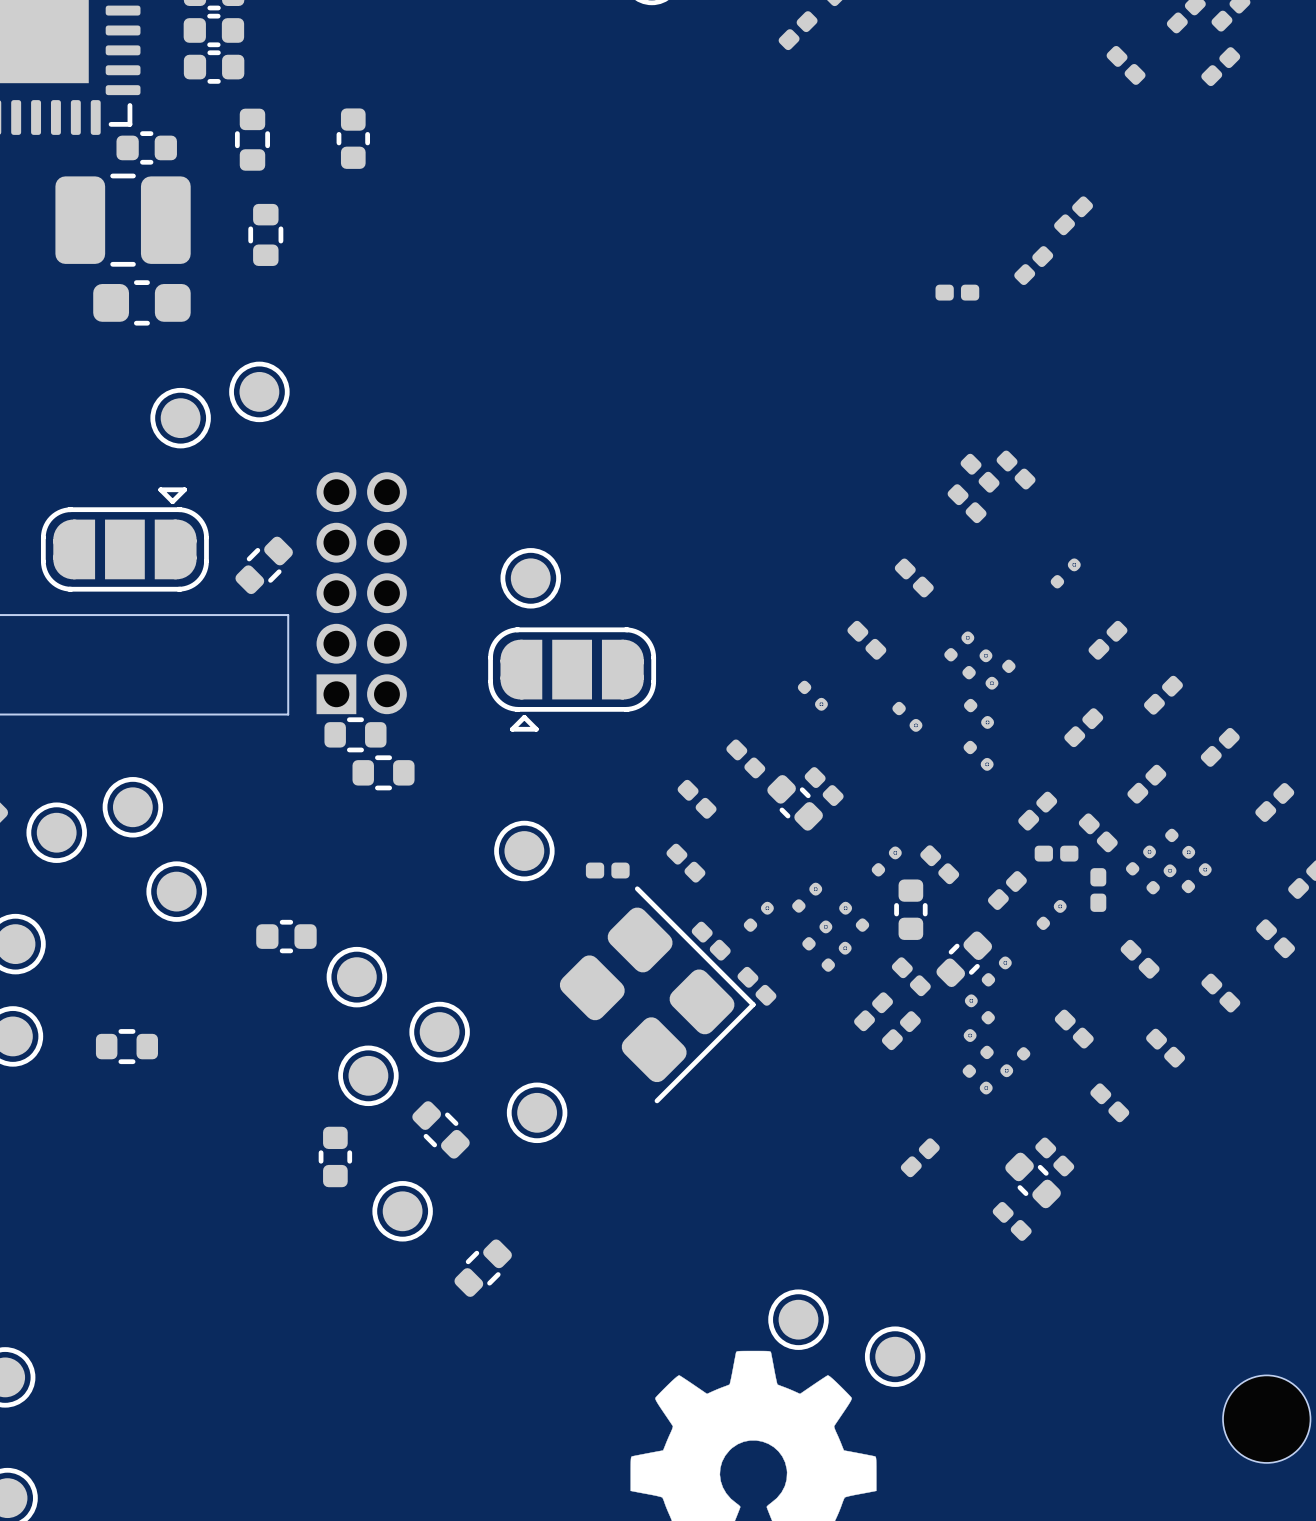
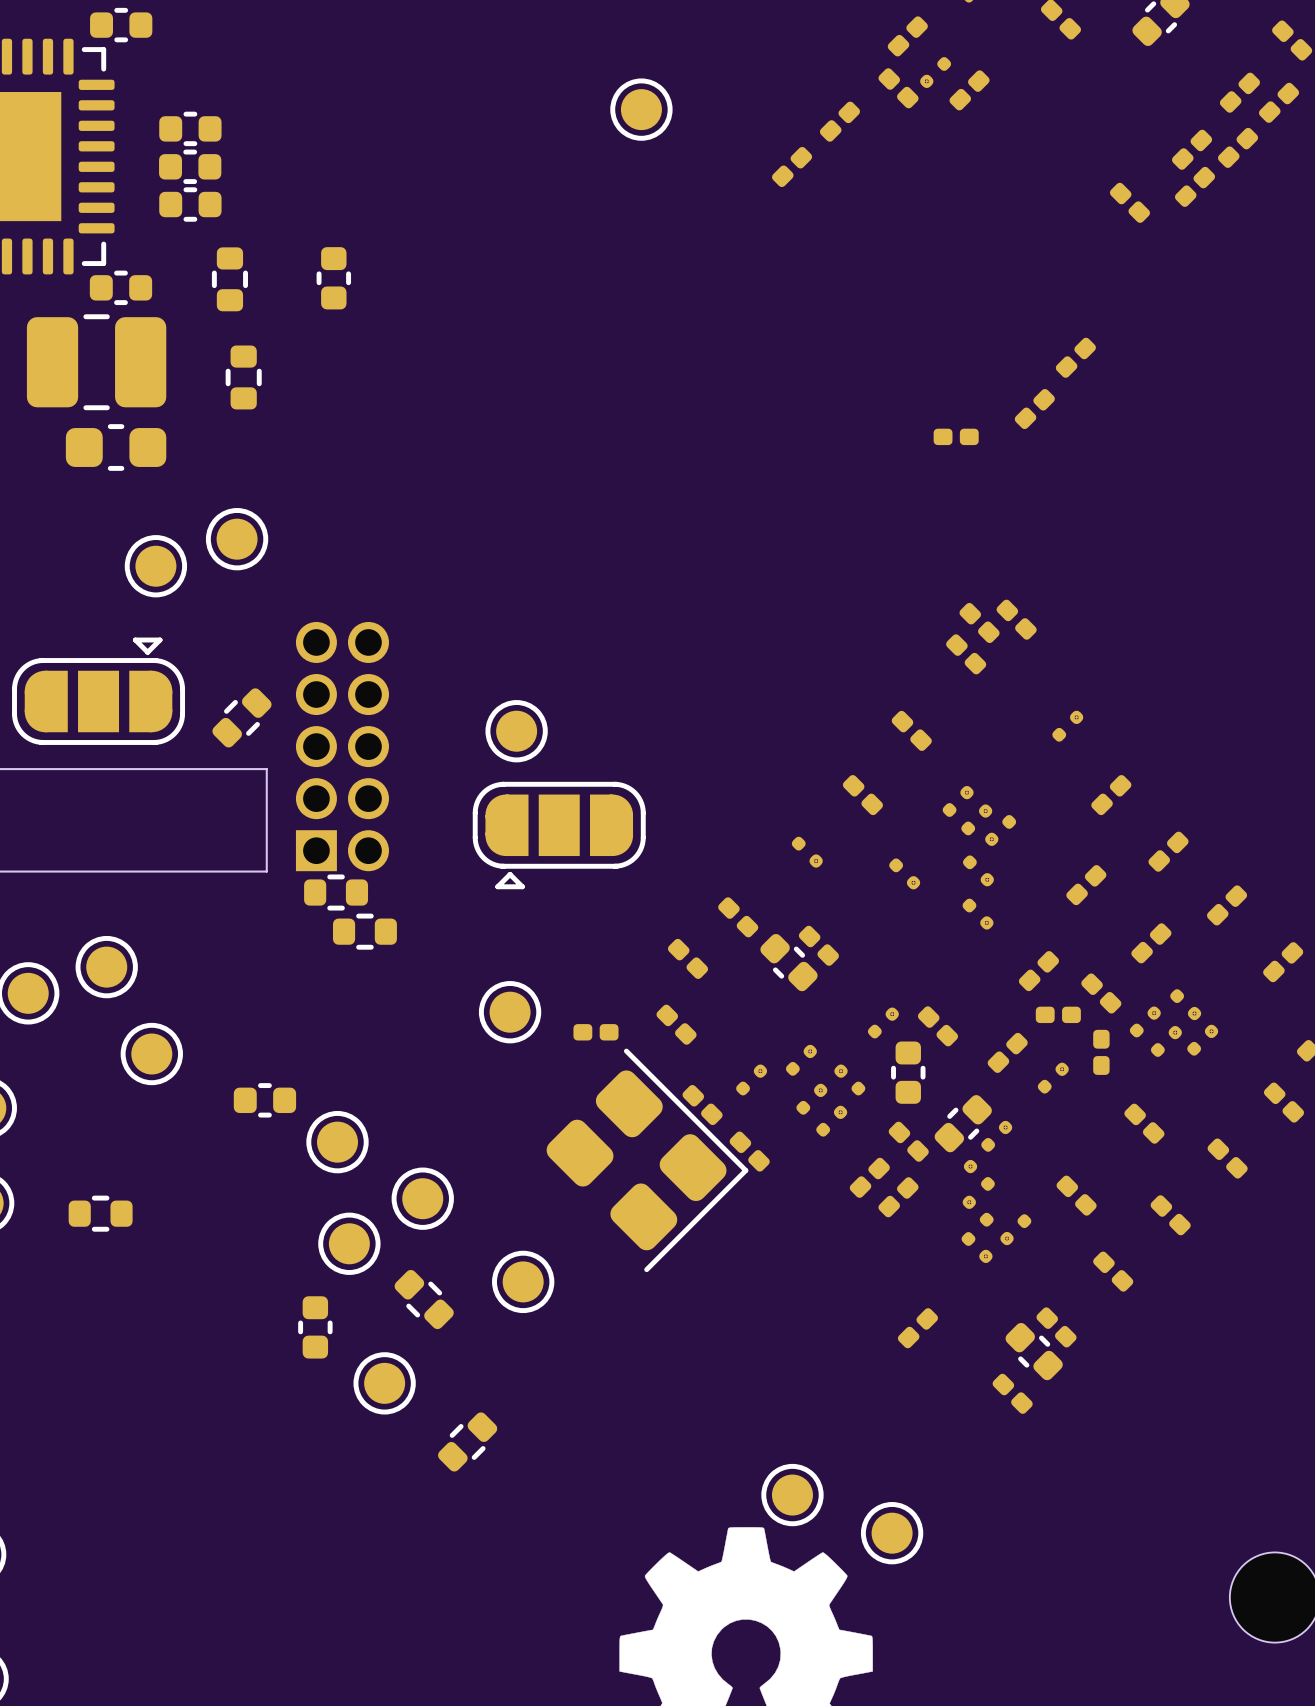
part position: (1220, 66) -> (1195, 186)

